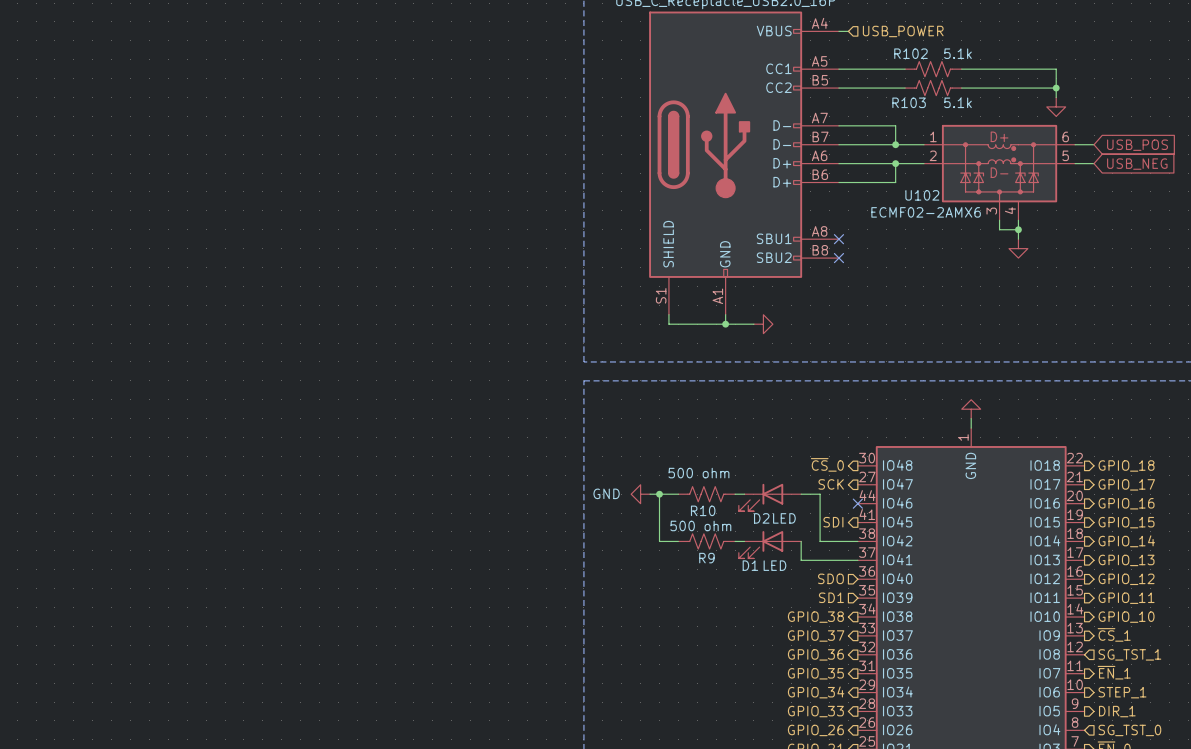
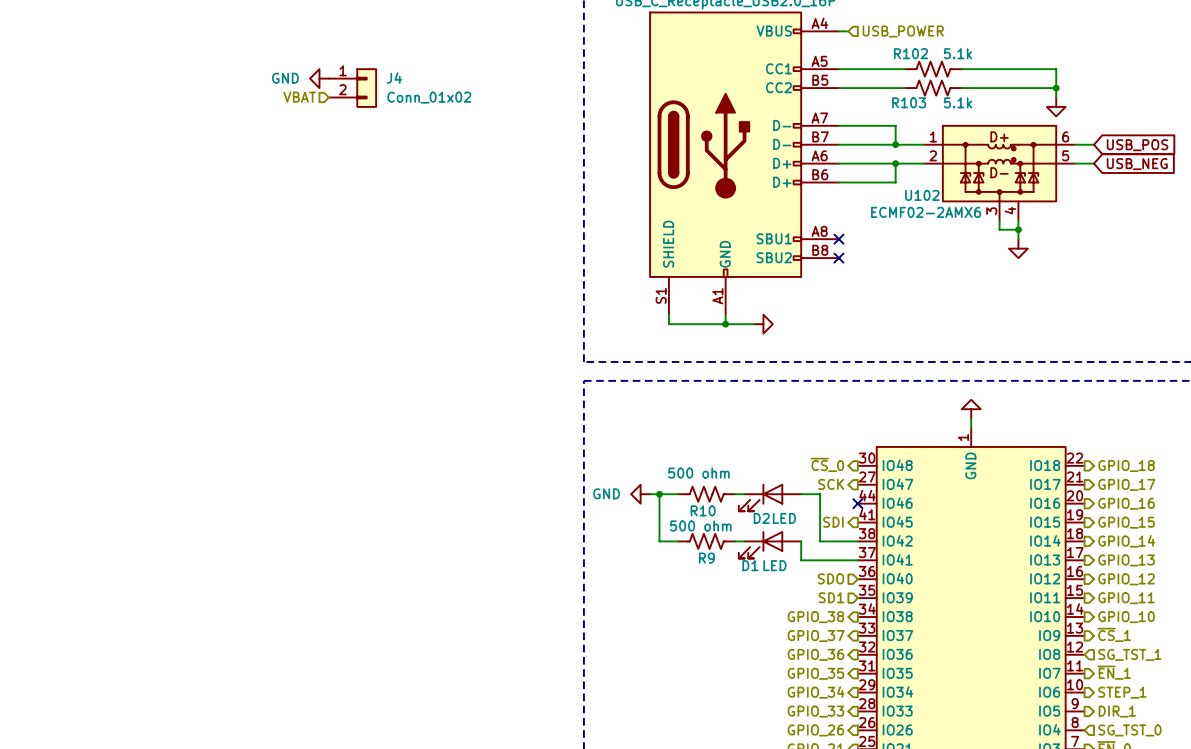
power symbol: none -> GND (319, 78)
J4: none -> Conn_01x02 (352, 88)
hierarchical label: none -> VBAT (299, 97)

